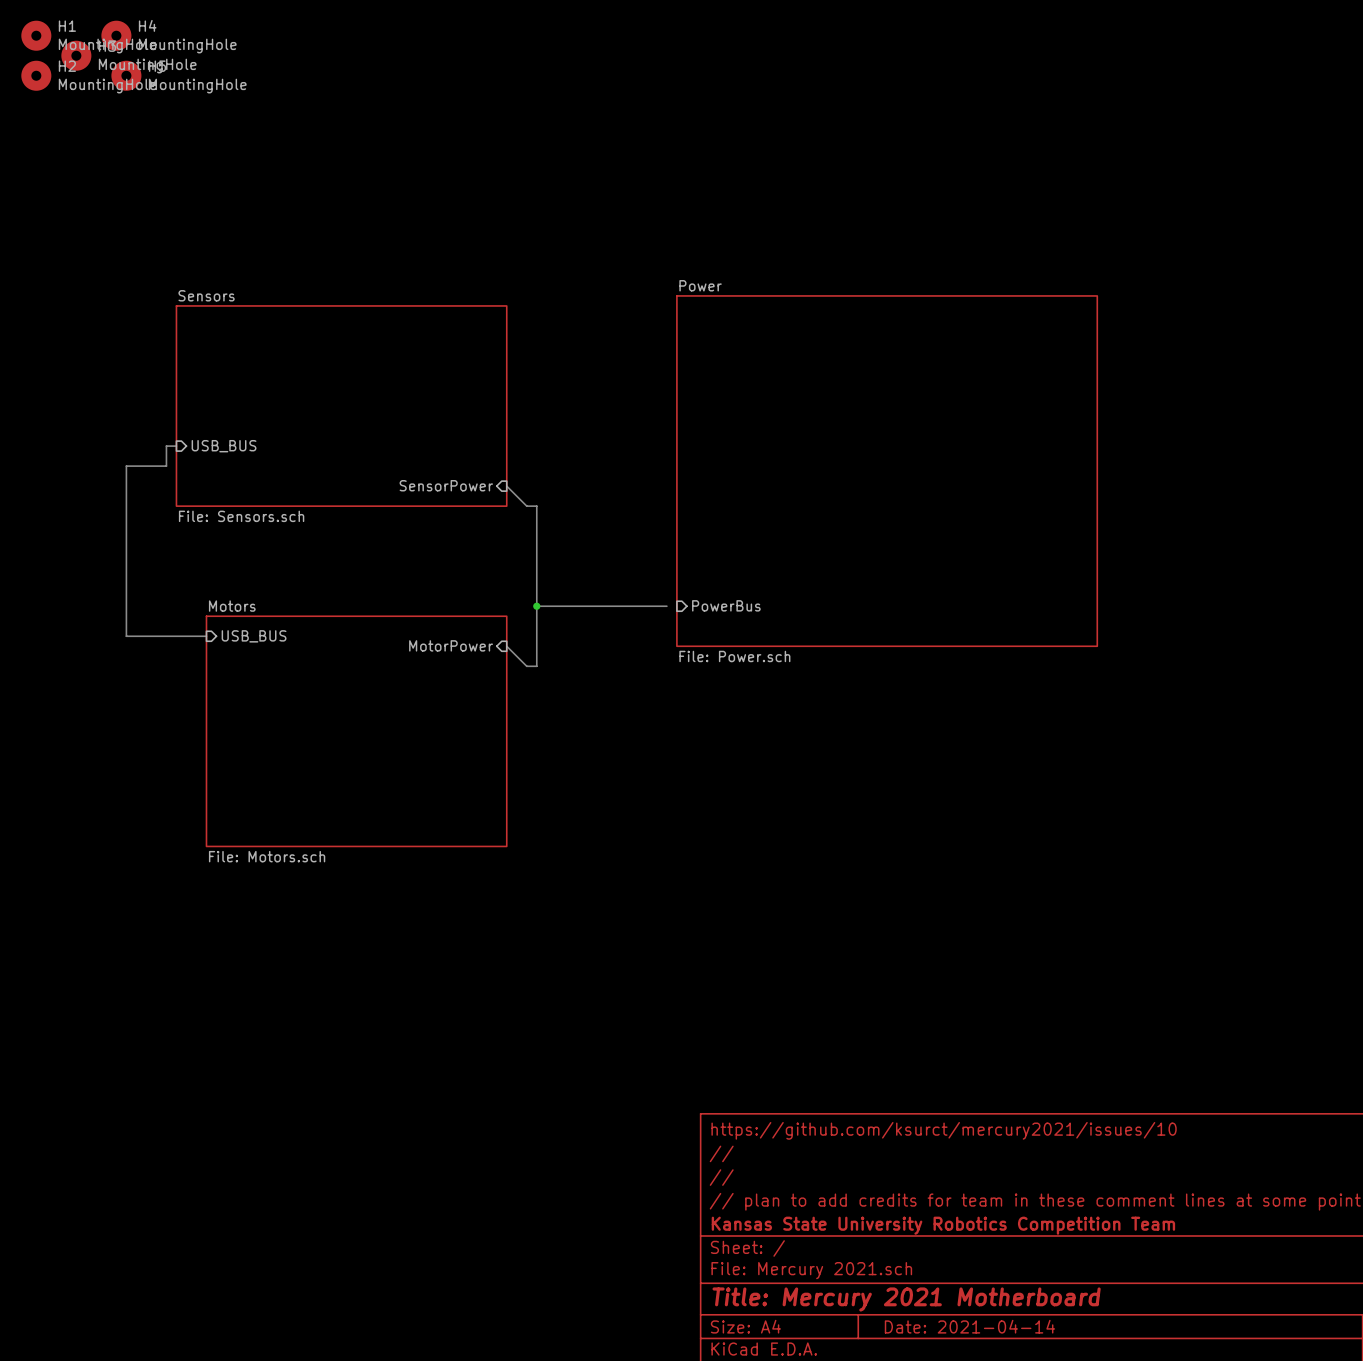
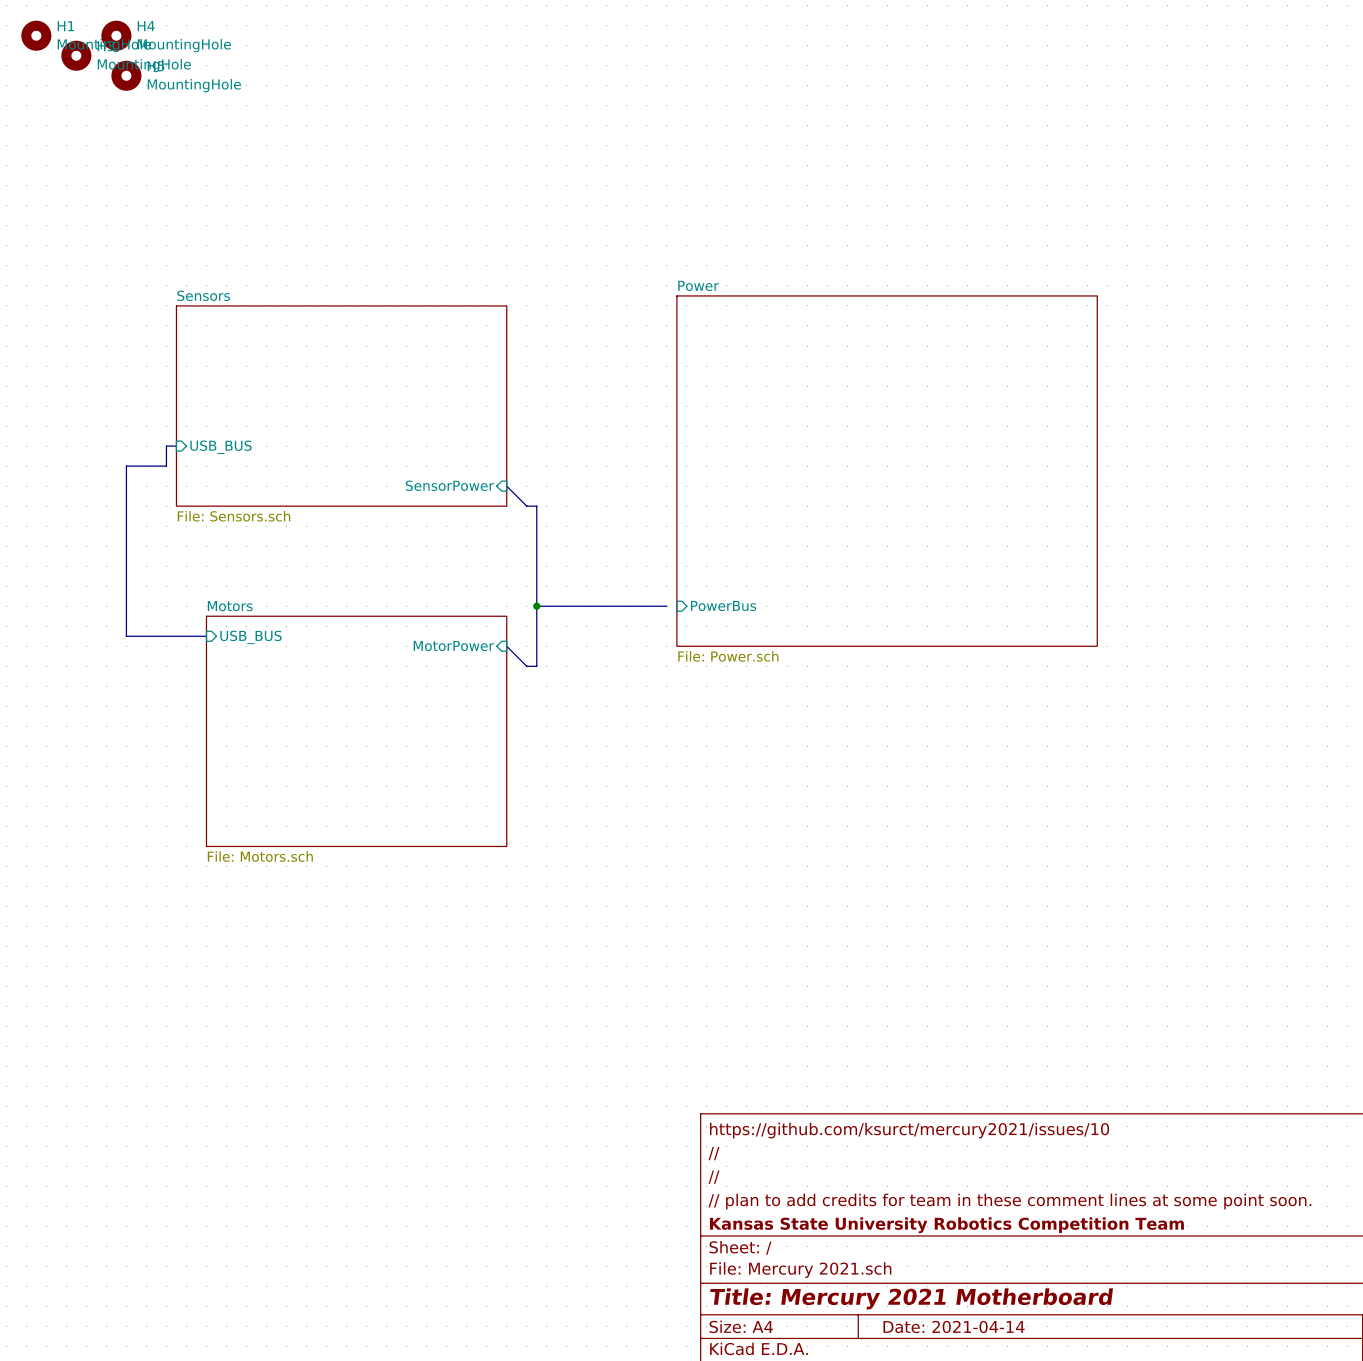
H2: MountingHole (36, 75) -> none

